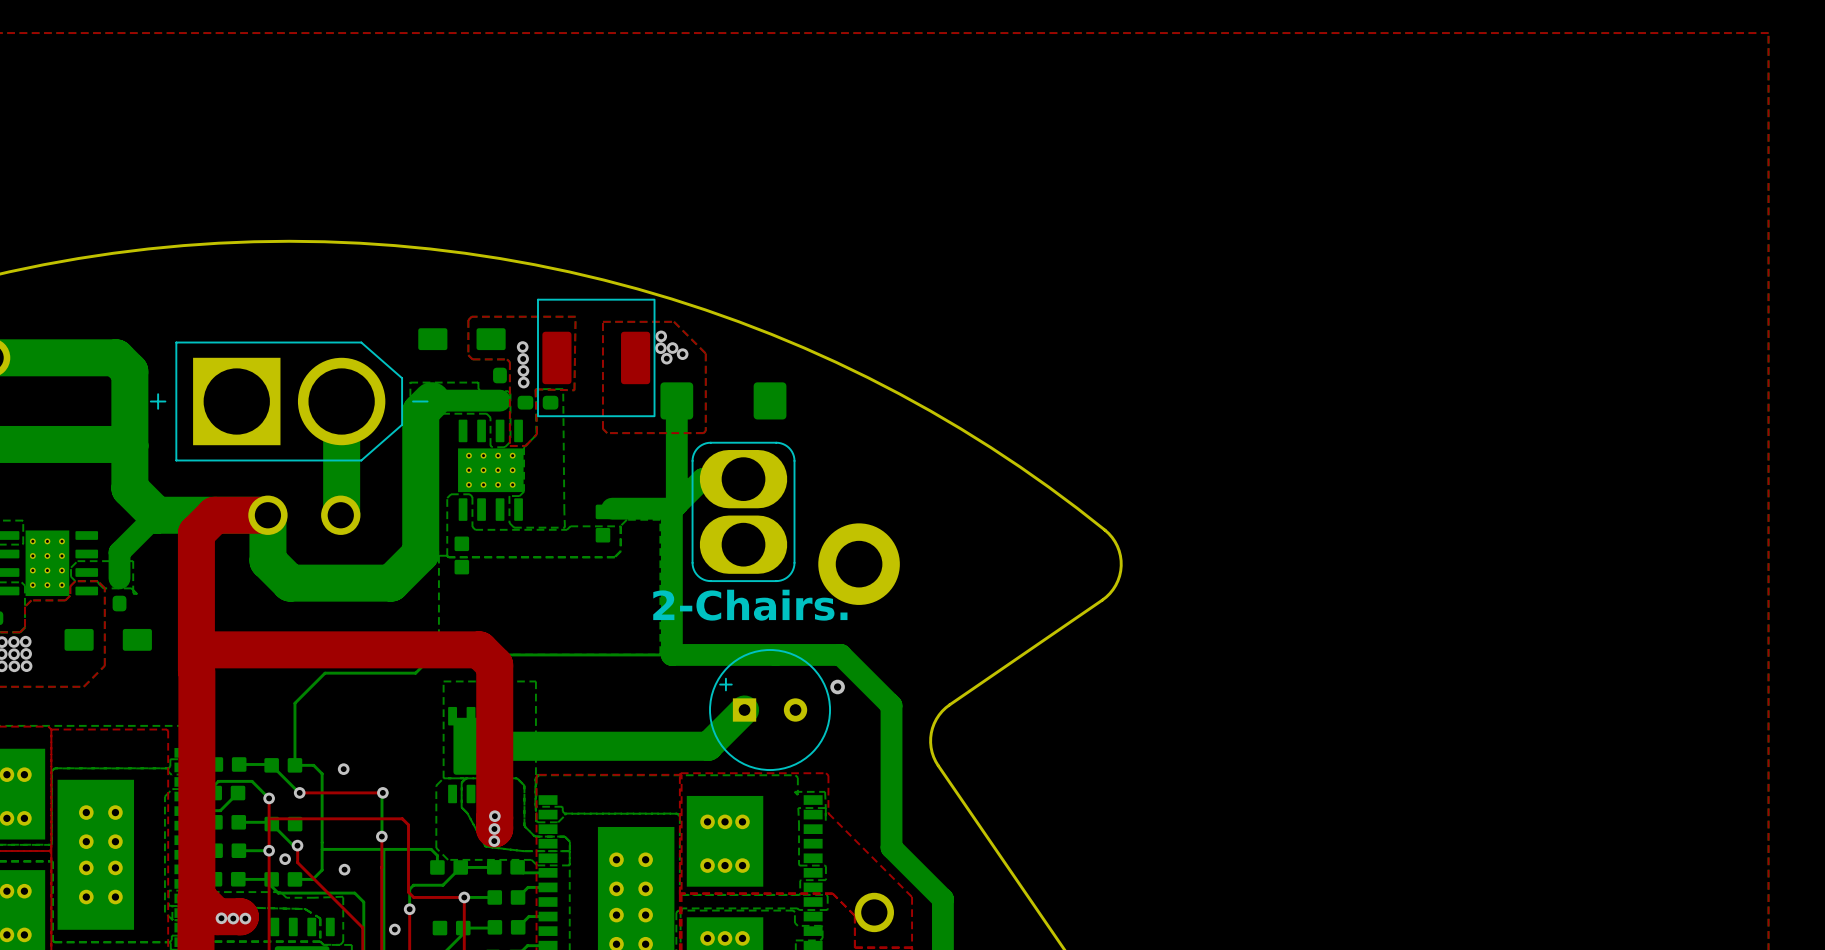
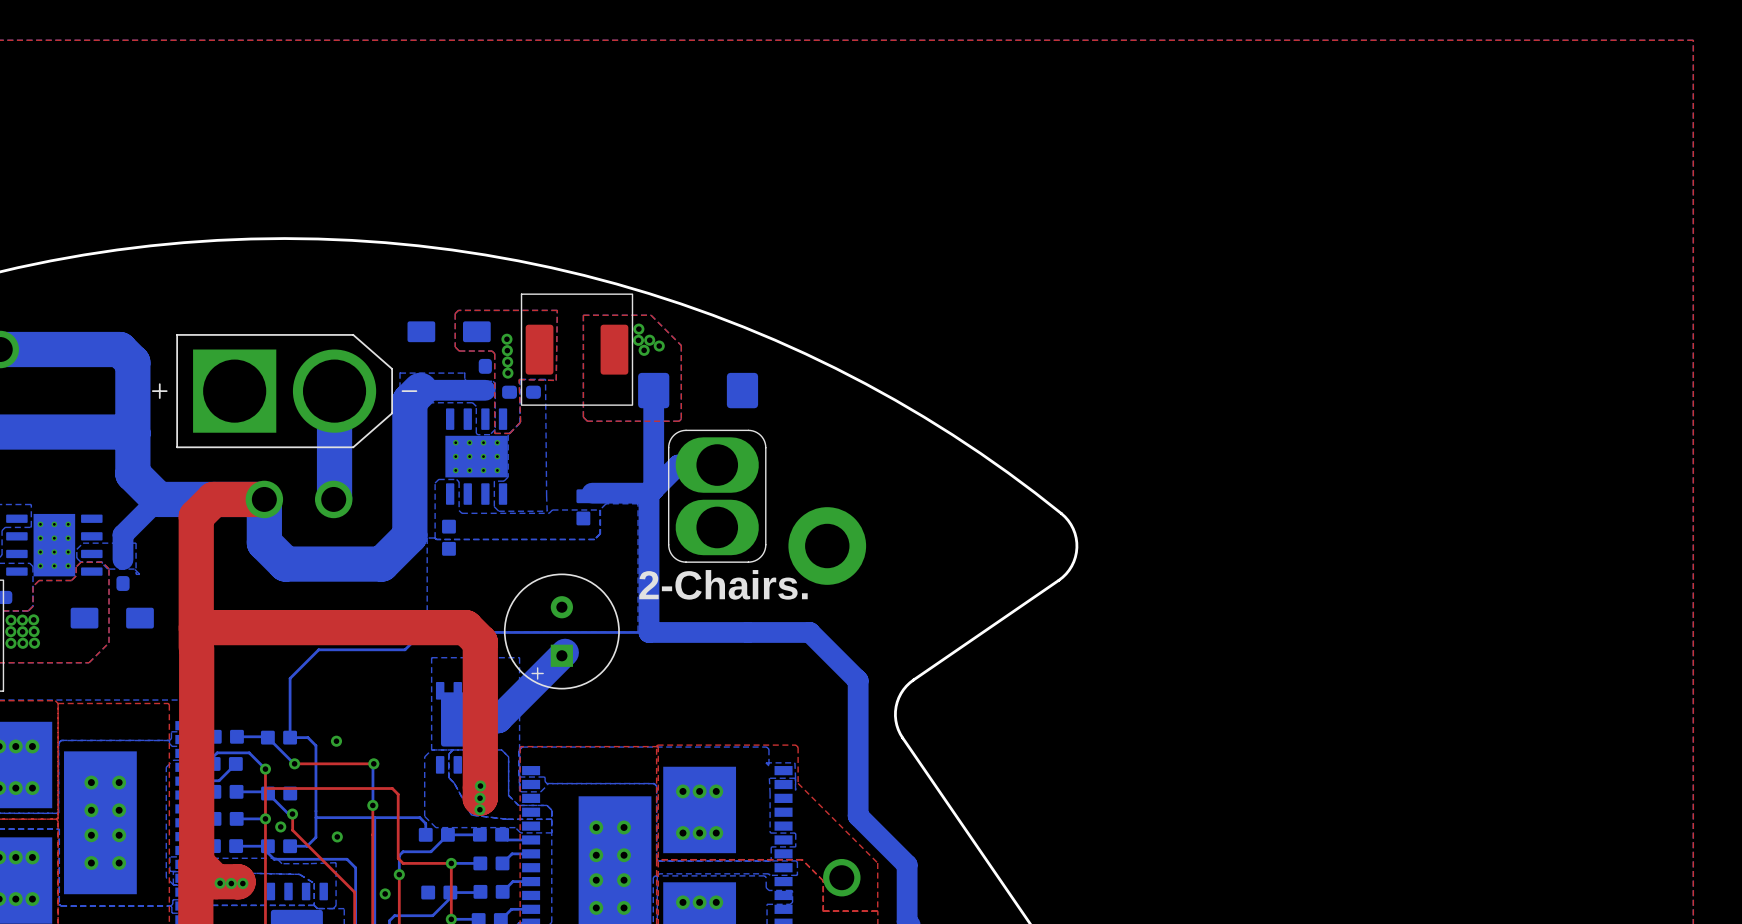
via: (837, 686) -> none
bottom track: (744, 710) (708, 746) (513, 746) -> (565, 652) (498, 719)
part rotation: 0° (770, 710) -> 90° counterclockwise (561, 631)
part position: (770, 710) -> (561, 631)

